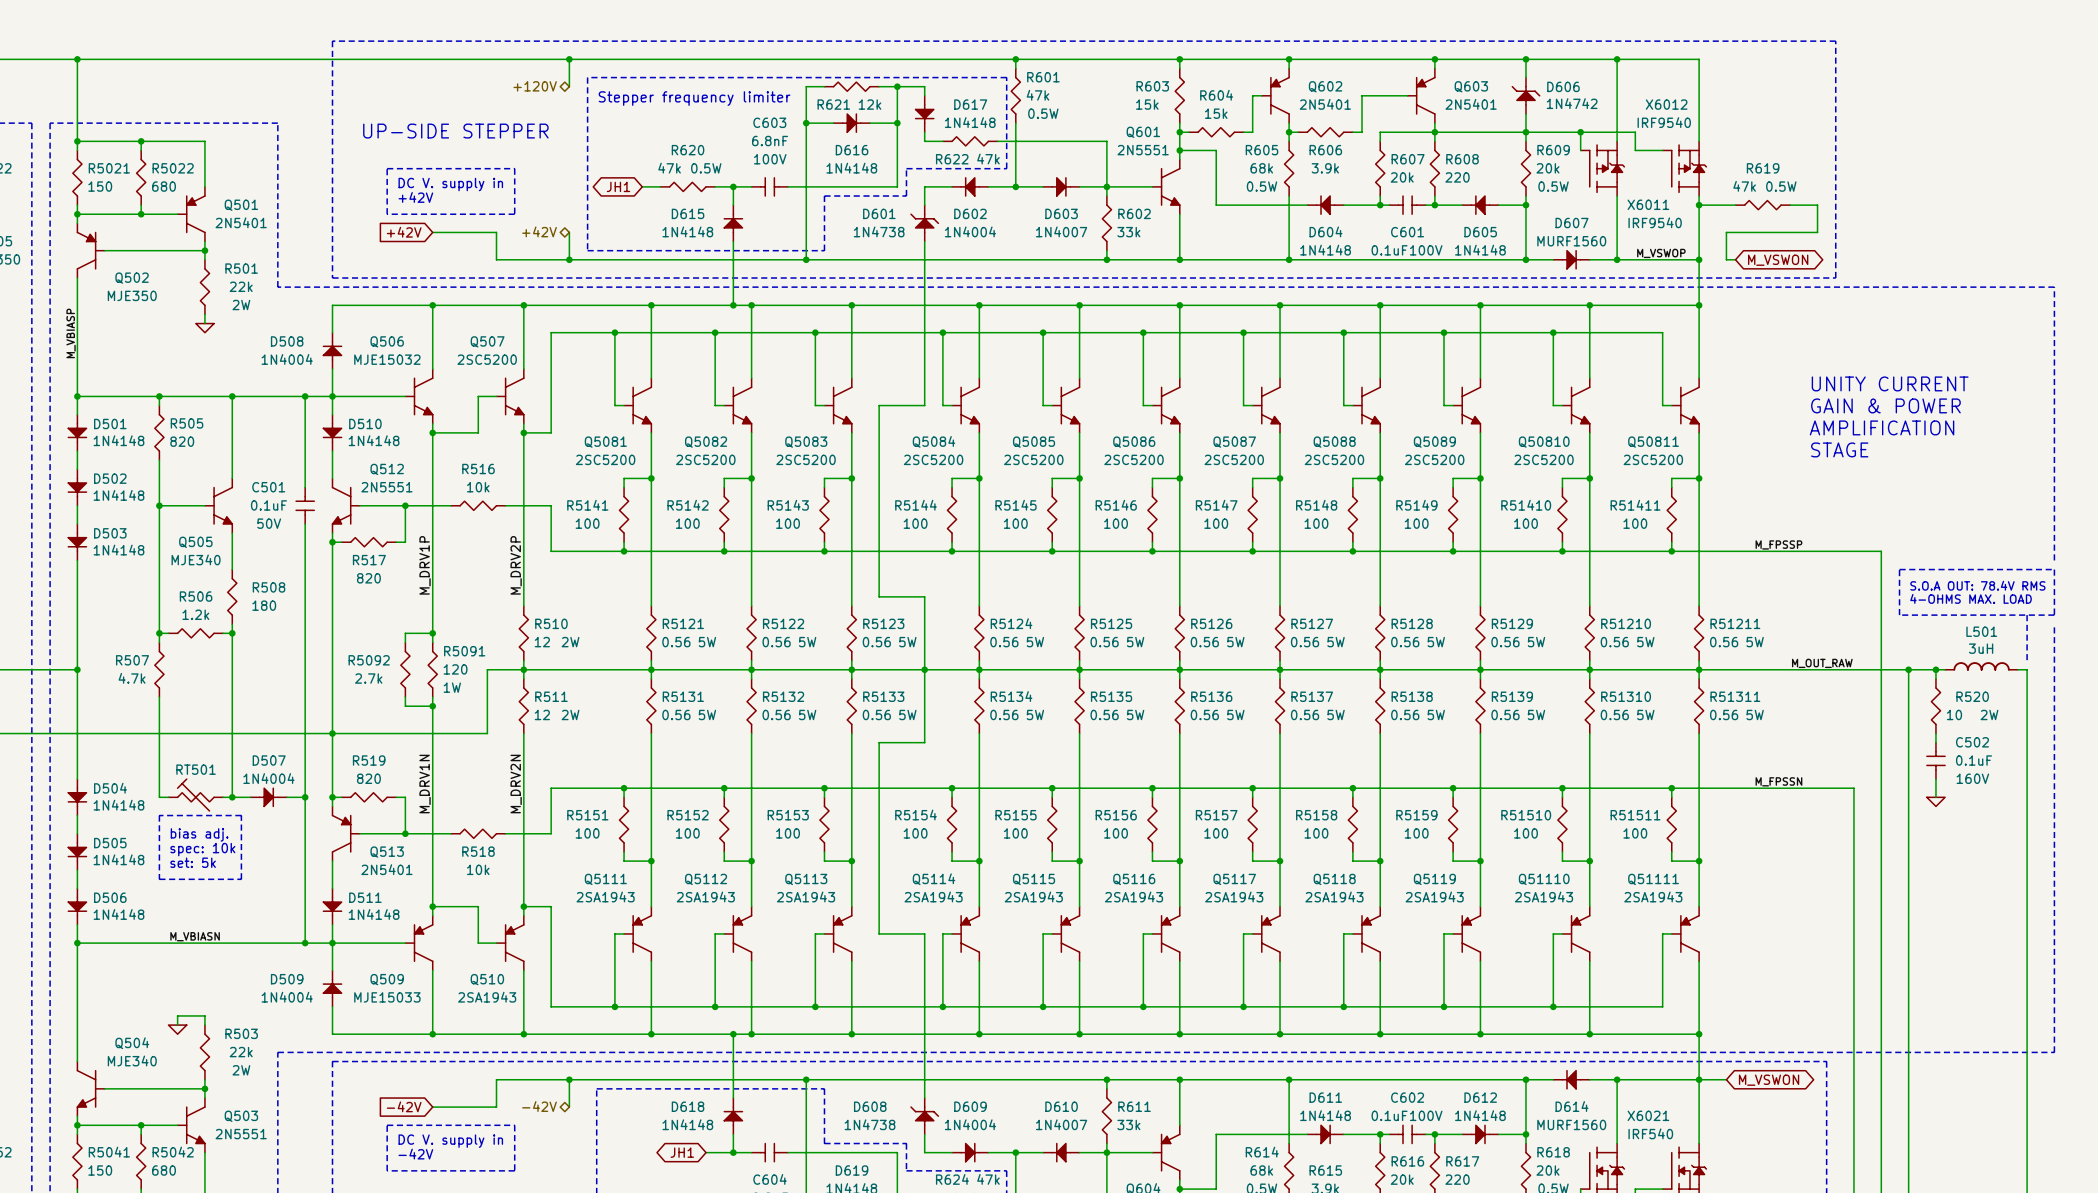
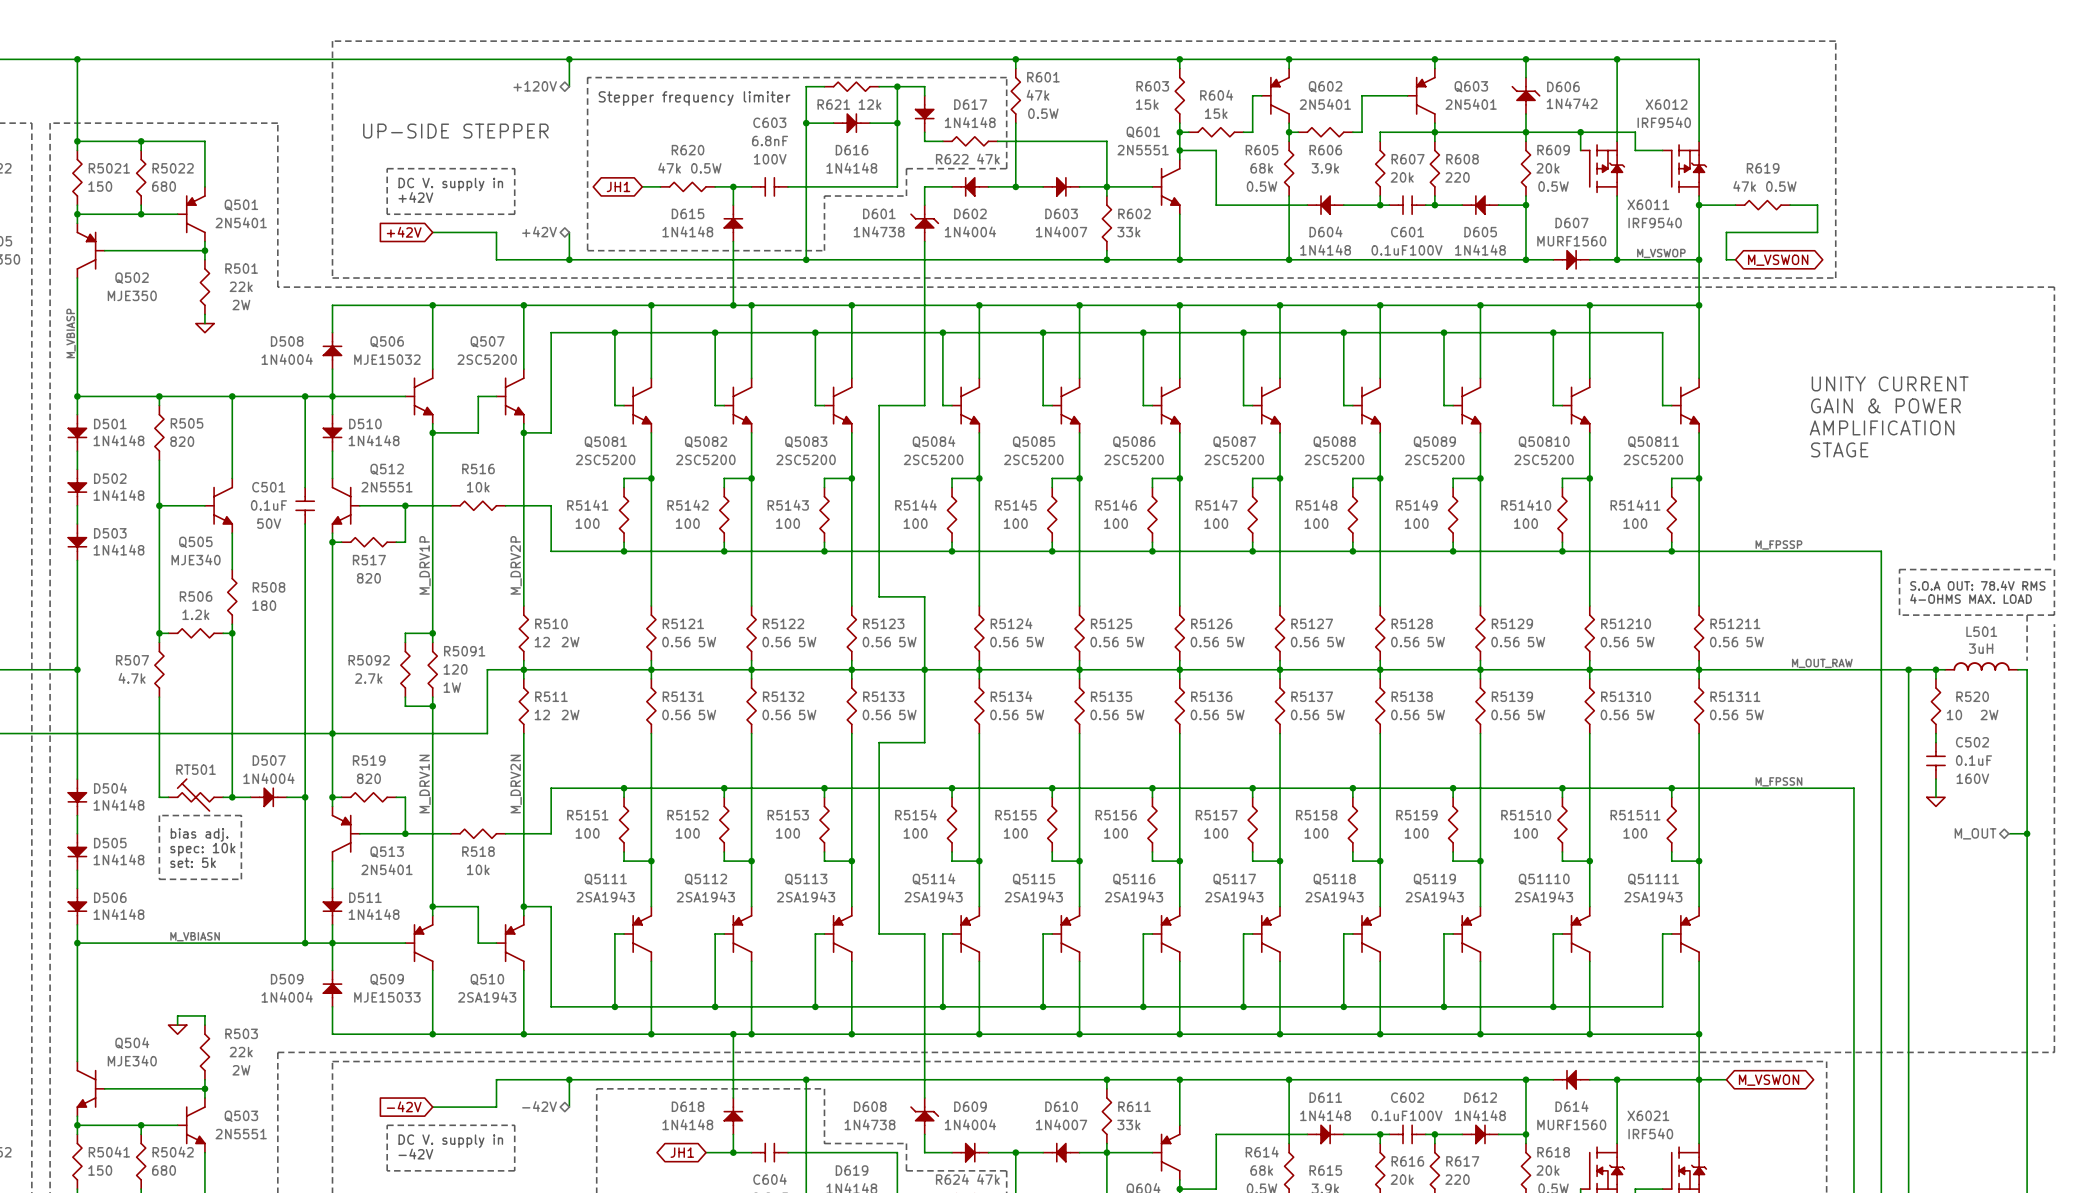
hierarchical label: none -> M_OUT (1975, 833)
wire: none -> (2008, 833) (2027, 833)
junction: none -> (2027, 833)

